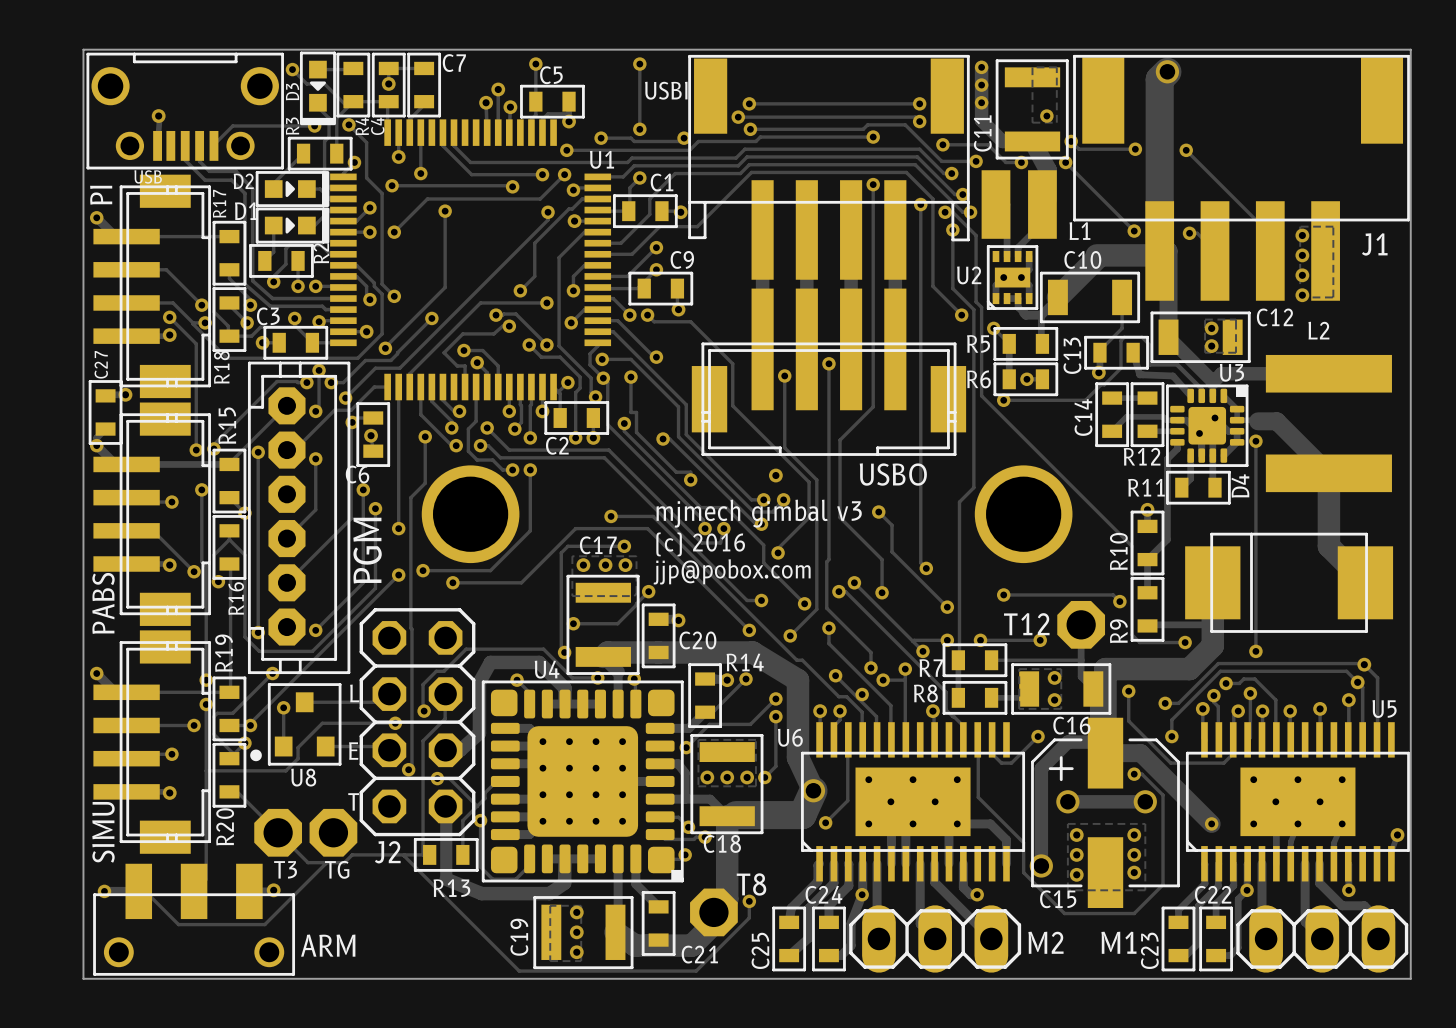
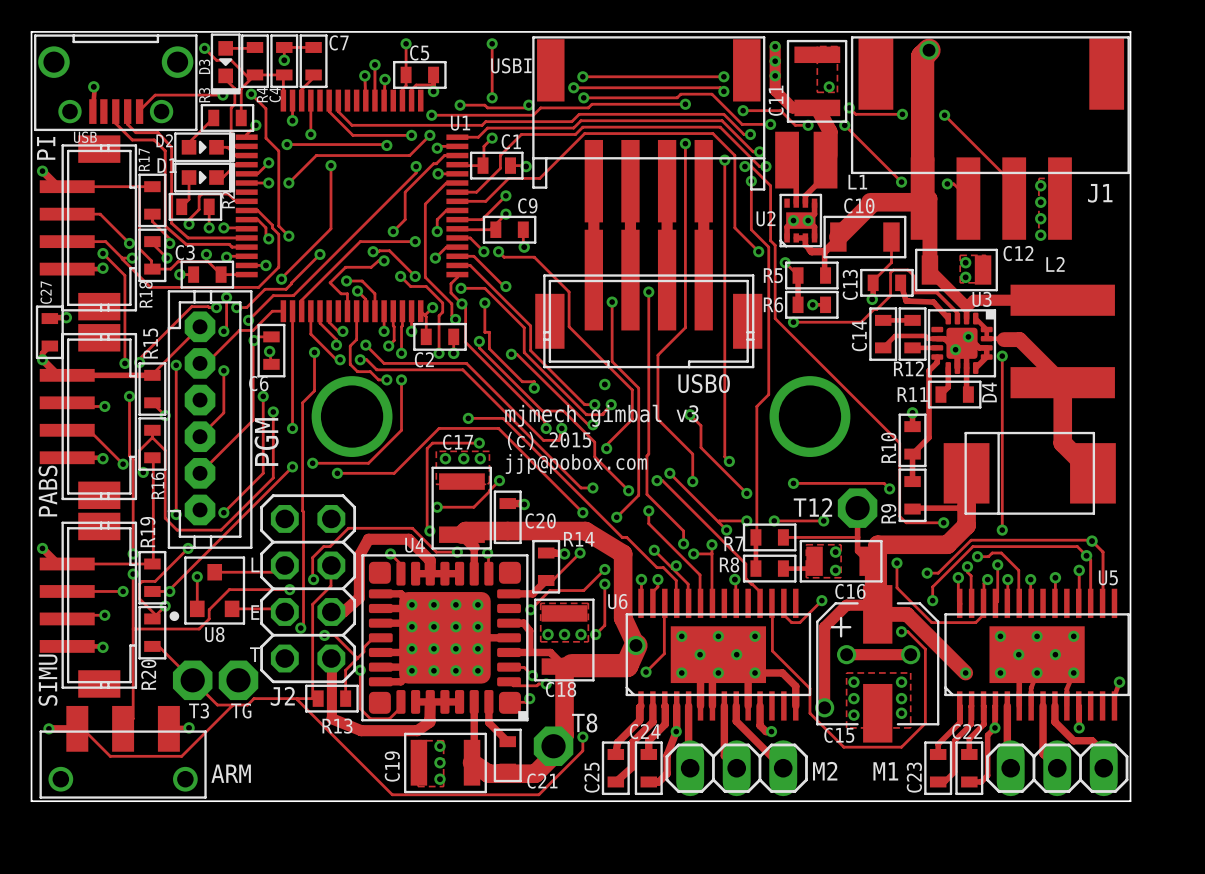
text: (c) 2016 (700, 544) -> (c) 2015 (549, 440)

